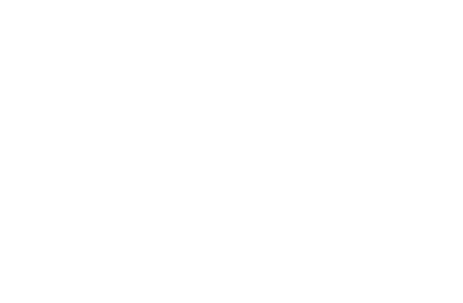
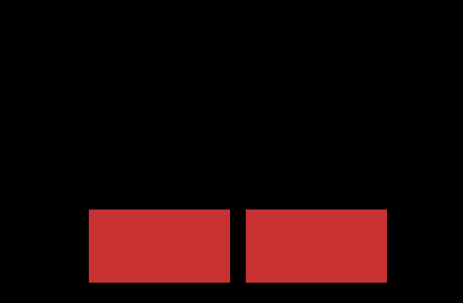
part: none -> (159, 246)
part: none -> (316, 246)

